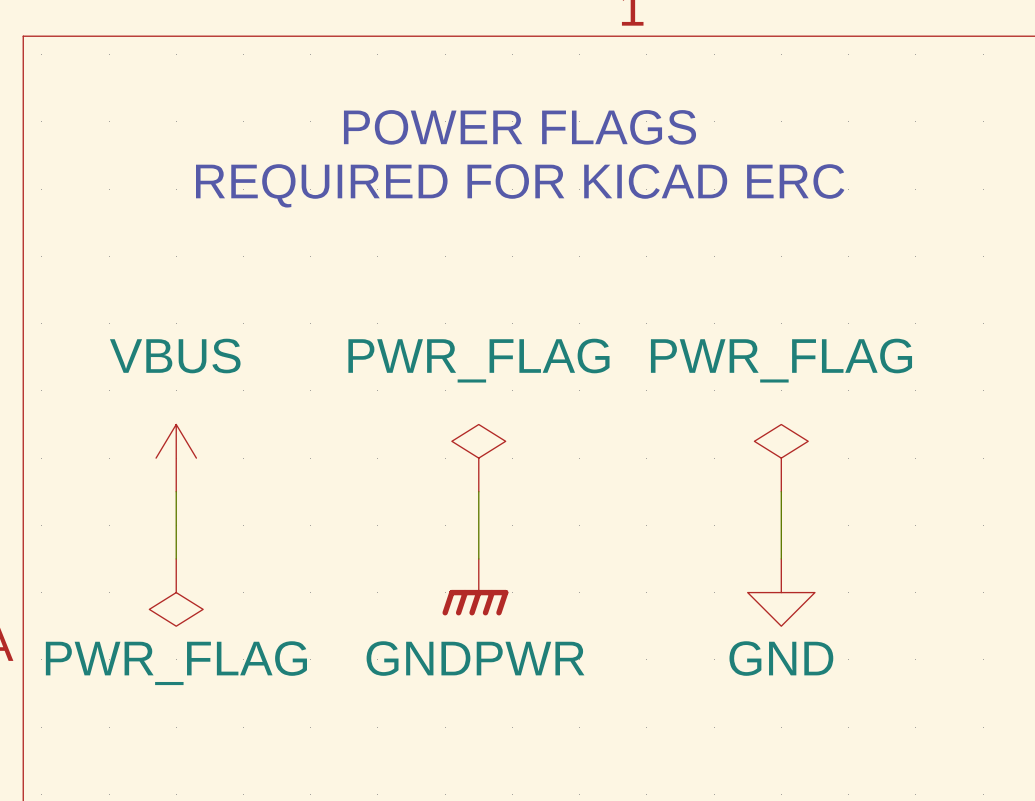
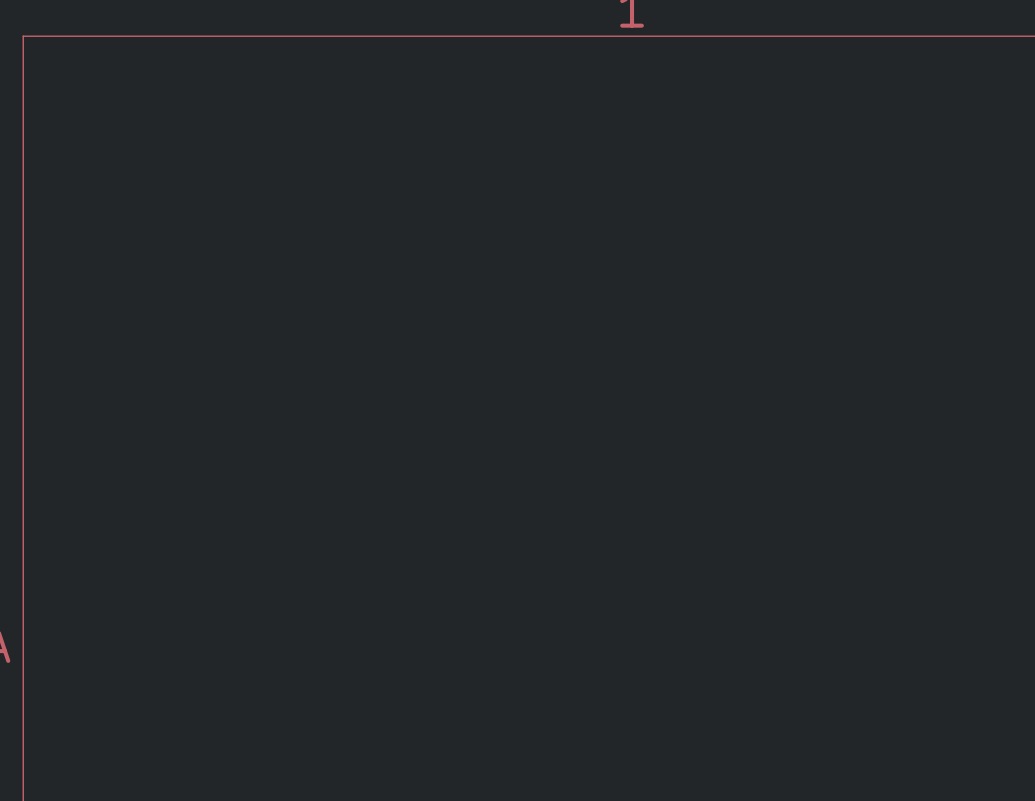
text: POWER FLAGS (520, 127) -> none
text: REQUIRED FOR KICAD ERC (520, 185) -> none
power symbol: VBUS (176, 458) -> none
power symbol: PWR_FLAG (478, 458) -> none
power symbol: PWR_FLAG (781, 458) -> none
wire: (176, 491) (176, 558) -> none
wire: (478, 491) (478, 558) -> none
wire: (781, 491) (781, 558) -> none
power symbol: GNDPWR (475, 587) -> none
power symbol: PWR_FLAG (176, 592) -> none
power symbol: GND (781, 592) -> none

